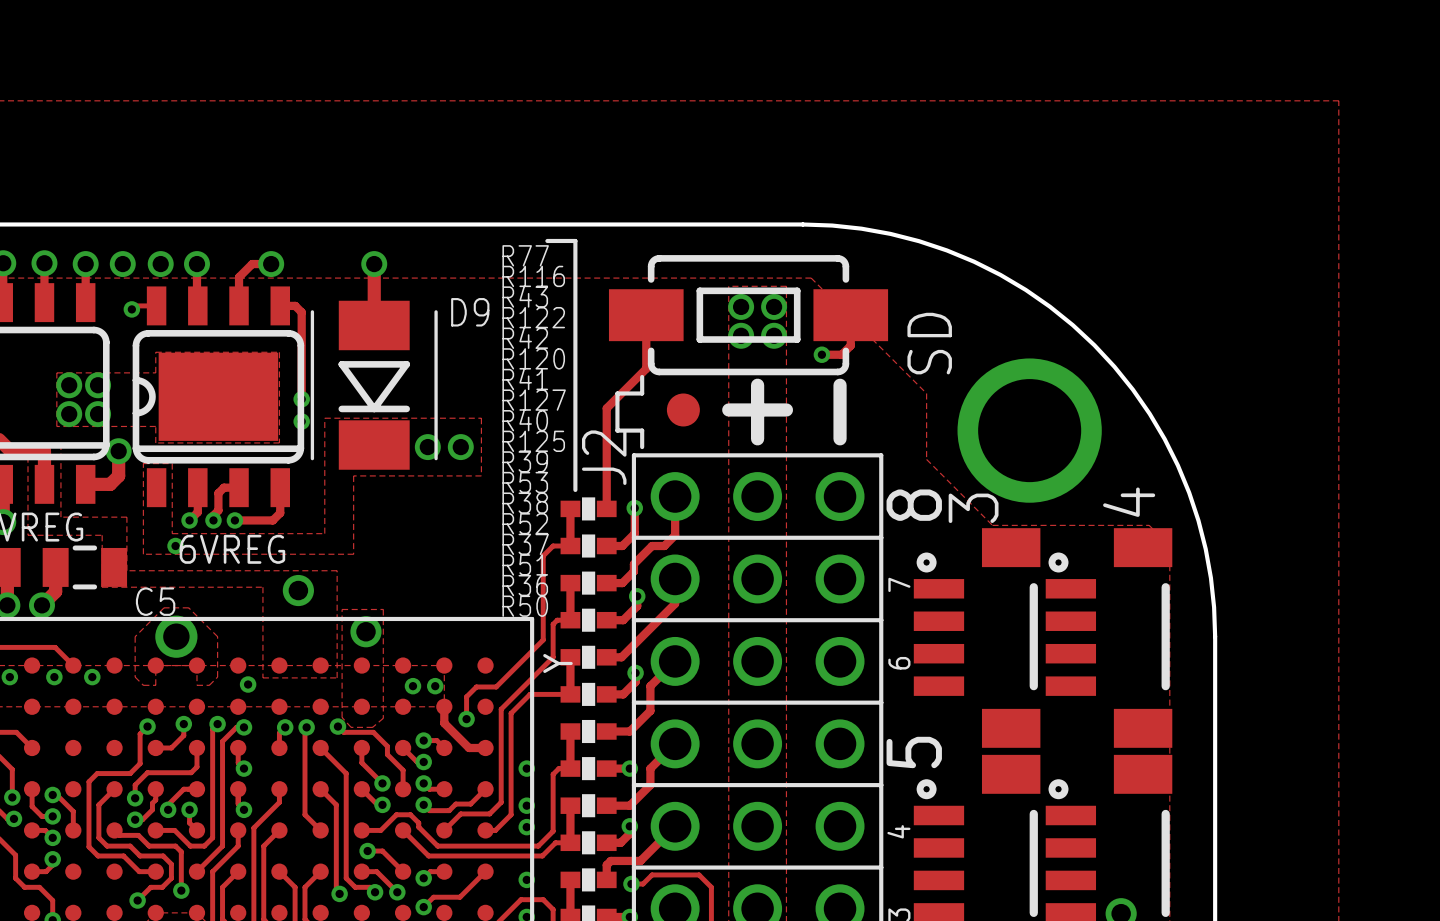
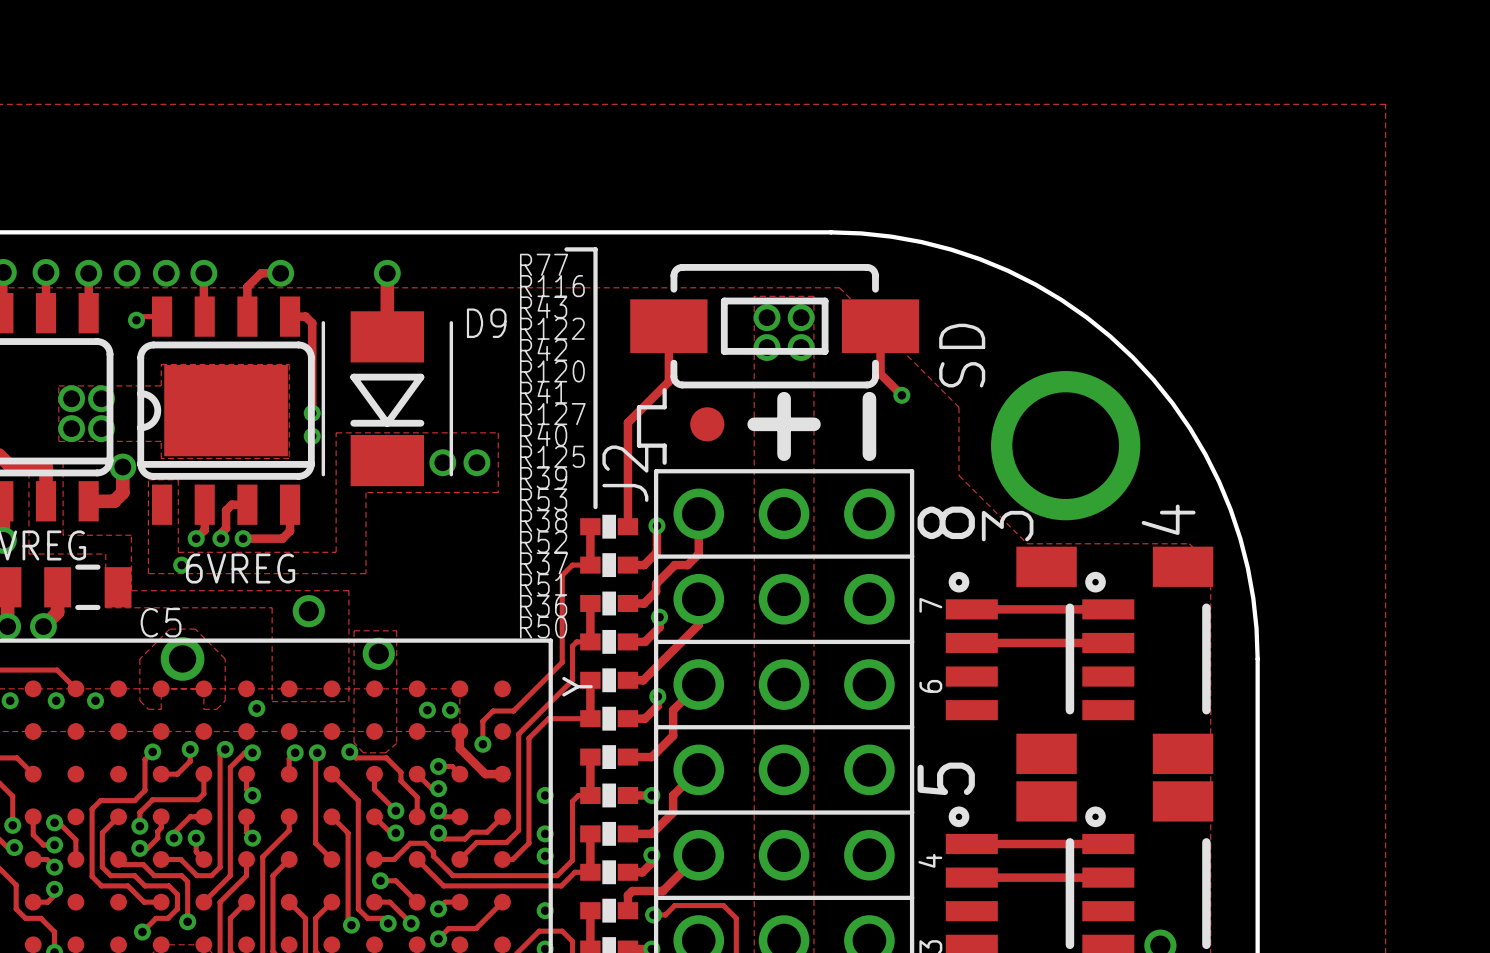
track: (850, 345) (841, 354) (821, 354) -> (880, 357) (880, 373) (901, 395)
via position: (821, 354) -> (901, 395)
track: none -> (971, 609) (1108, 609)
track: none -> (971, 642) (1108, 642)
track: none -> (971, 844) (1108, 844)
track: none -> (971, 877) (1108, 877)

